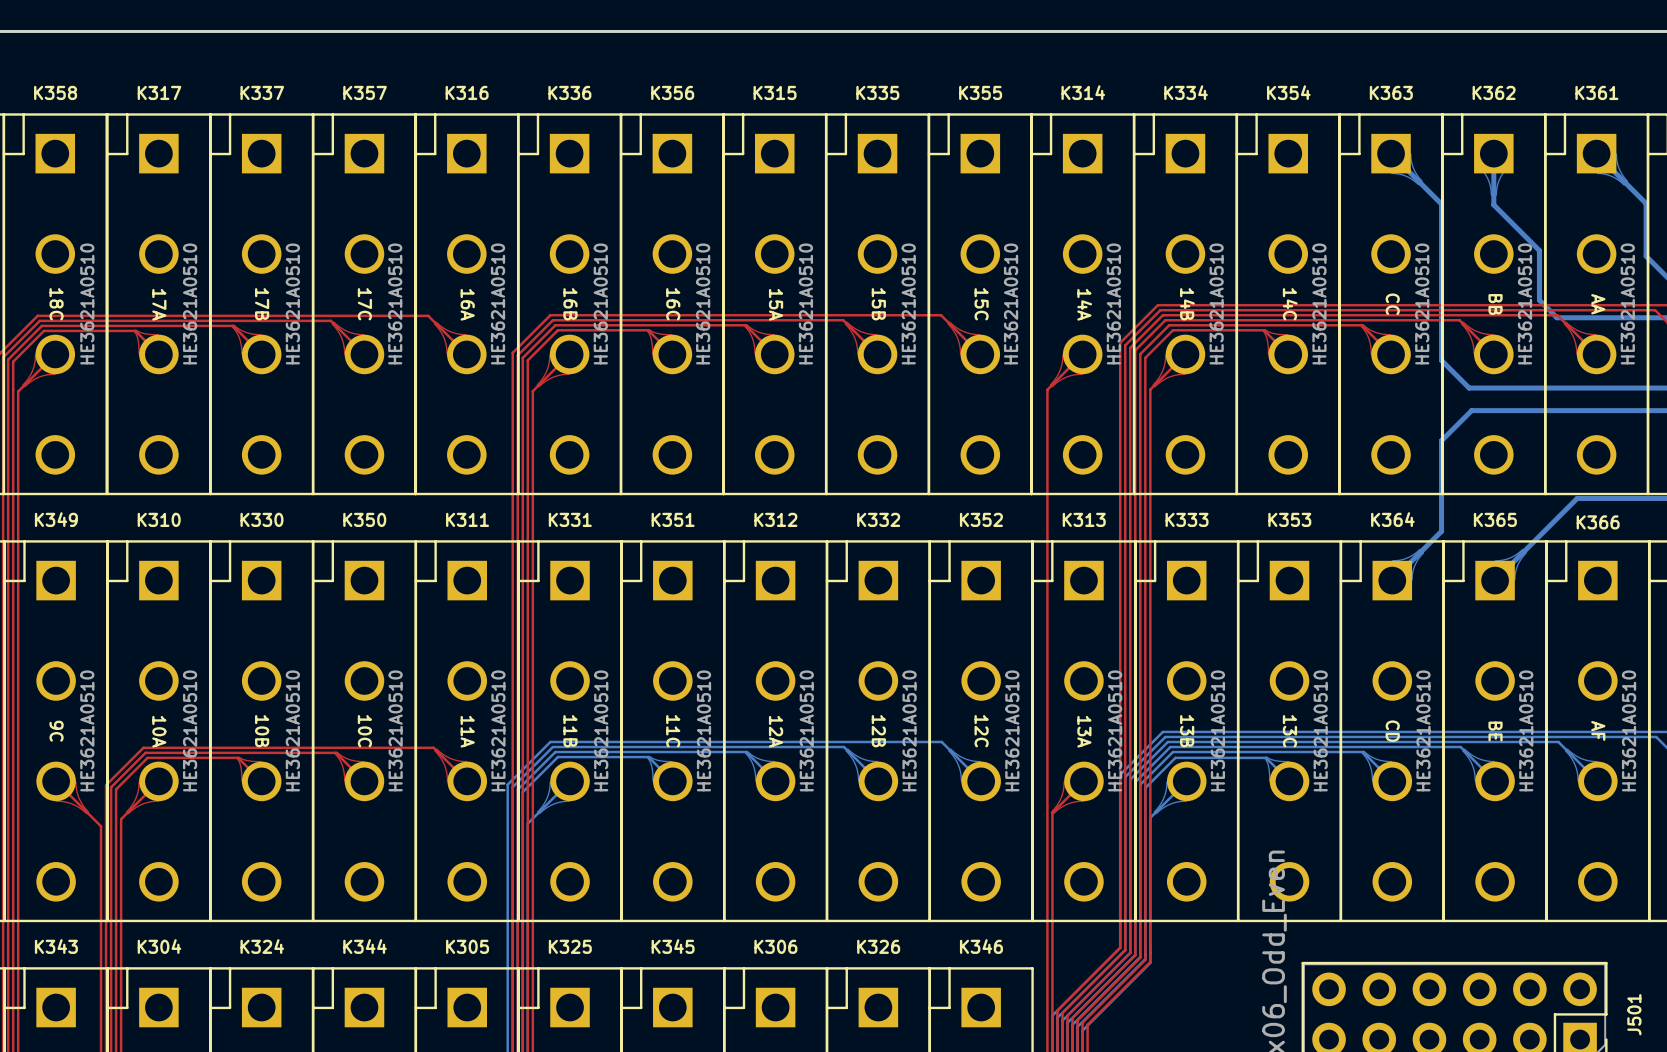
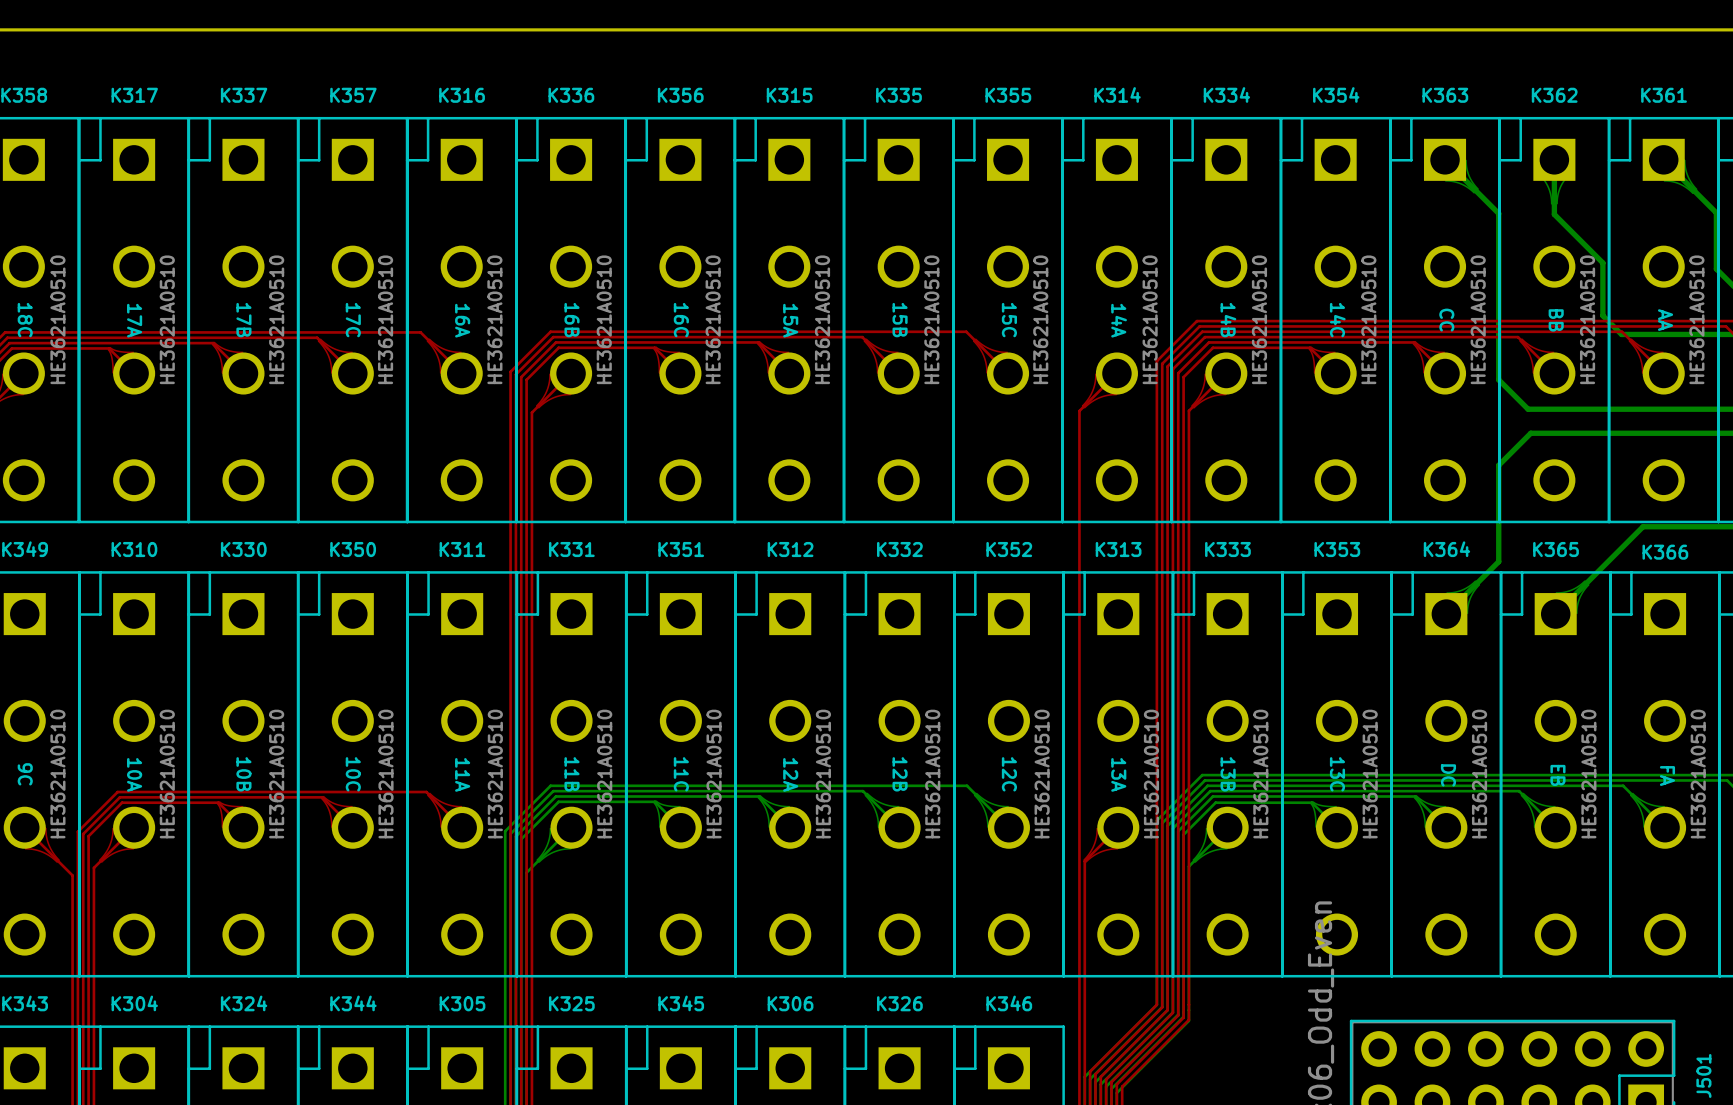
text: AF (1598, 730) -> FA (1667, 776)
text: CD (1392, 731) -> DC (1448, 775)
text: BE (1495, 731) -> EB (1557, 775)

